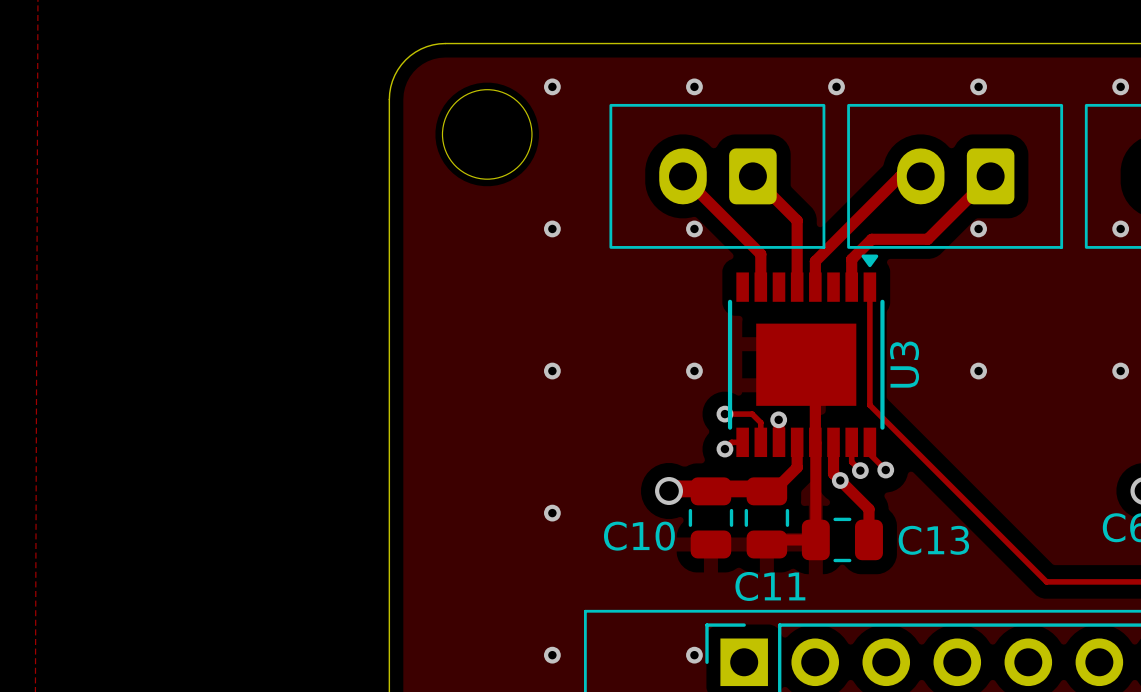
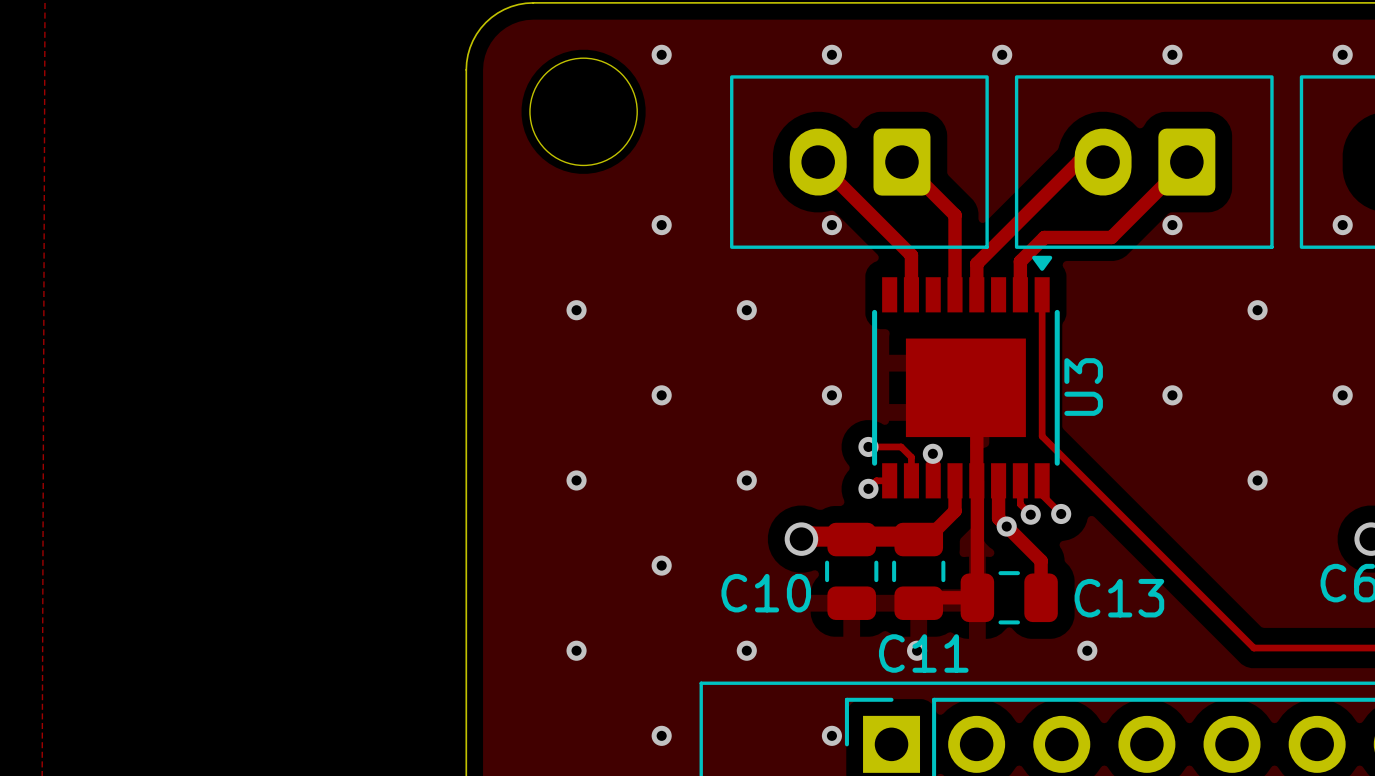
via: none -> (576, 310)
via: none -> (746, 310)
via: none -> (1257, 310)
via: none -> (576, 480)
via: none -> (746, 480)
via: none -> (1257, 480)
via: none -> (576, 650)
via: none -> (746, 650)
via: none -> (917, 650)
via: none -> (1087, 650)

